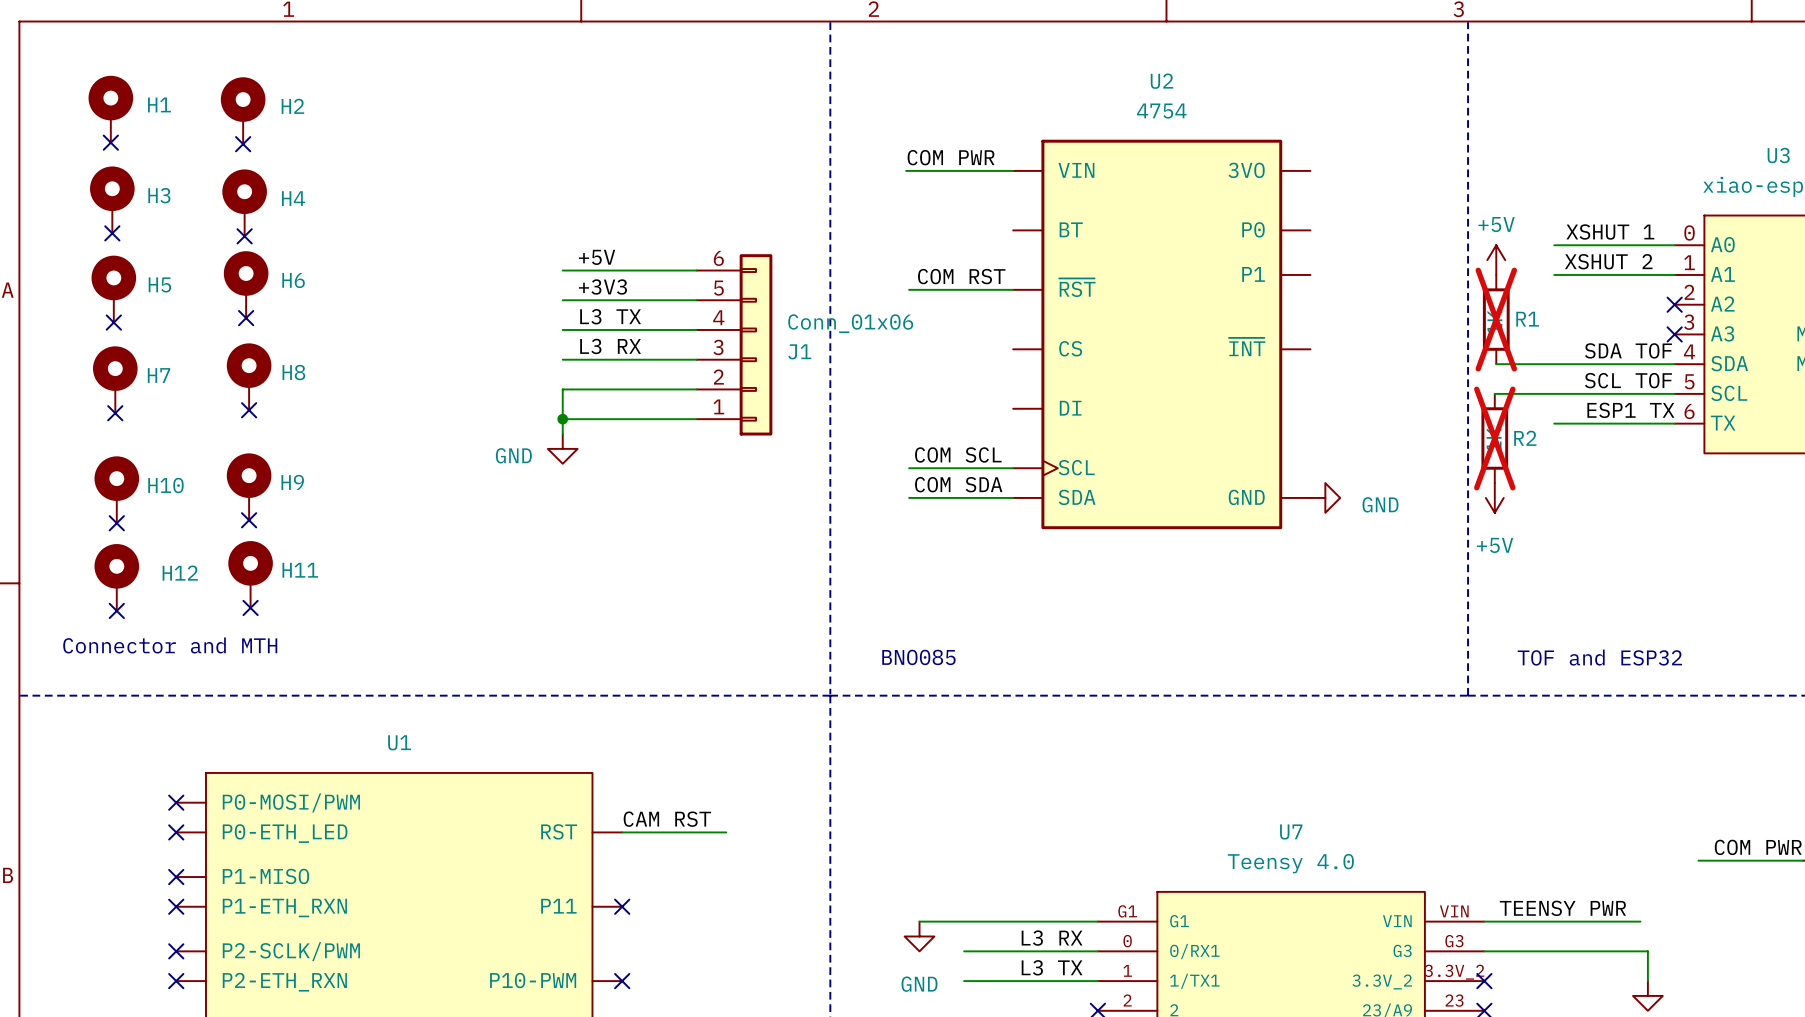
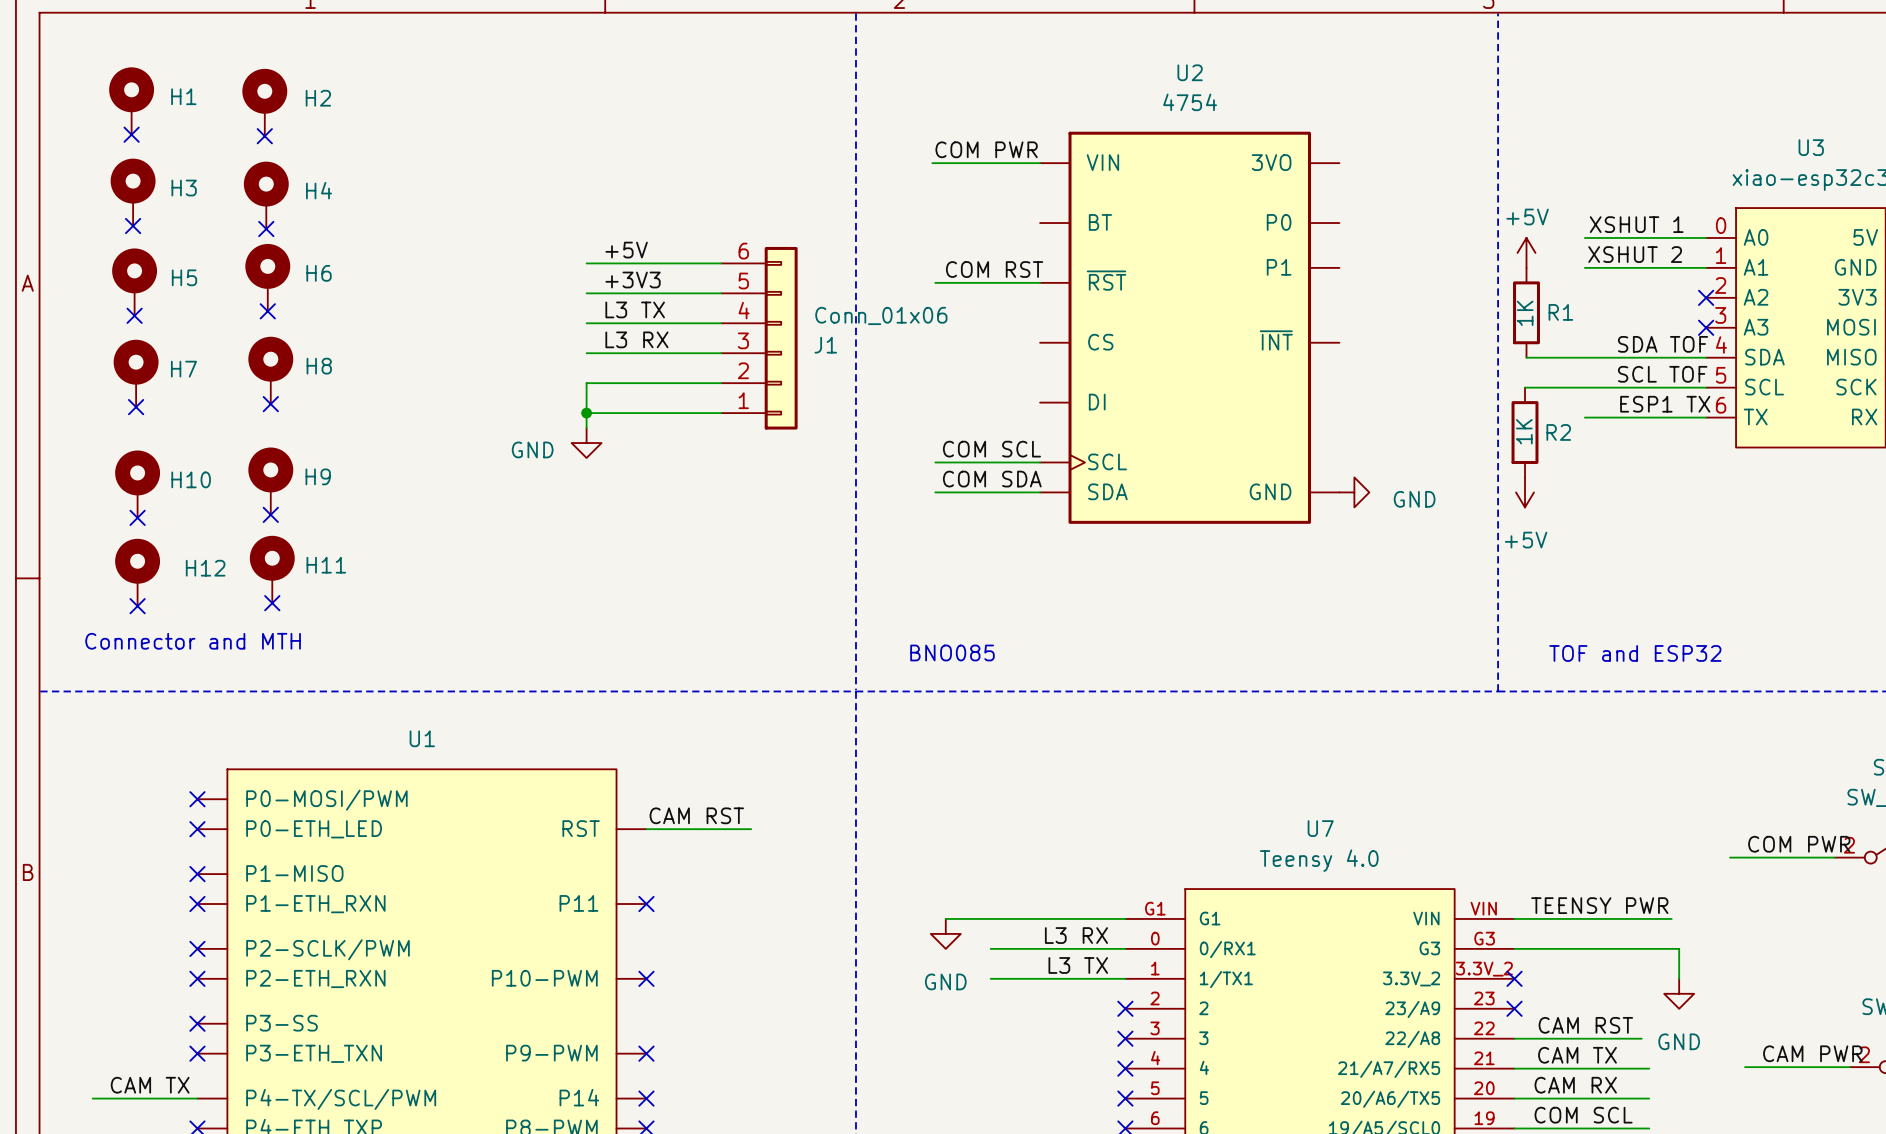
R1 do-not-place cross: (1496, 319) -> none
R2 do-not-place cross: (1494, 438) -> none

